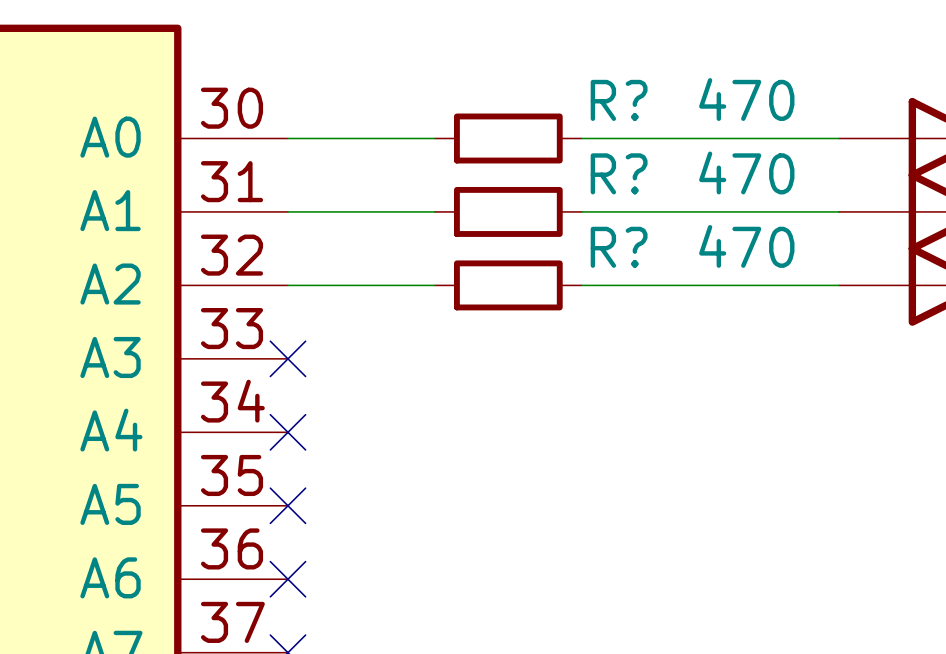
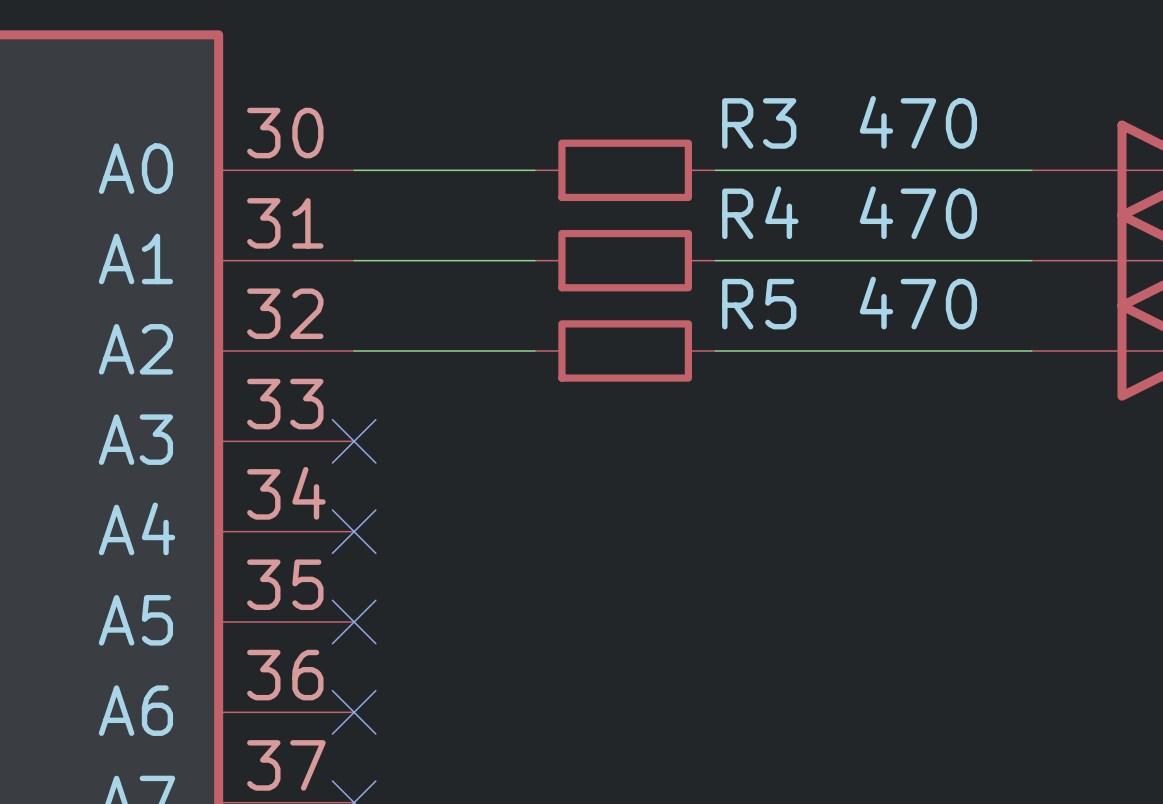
R? name: R? (619, 100) -> R3 (759, 123)
R? name: R? (619, 173) -> R4 (760, 212)
R? name: R? (619, 247) -> R5 (759, 304)

